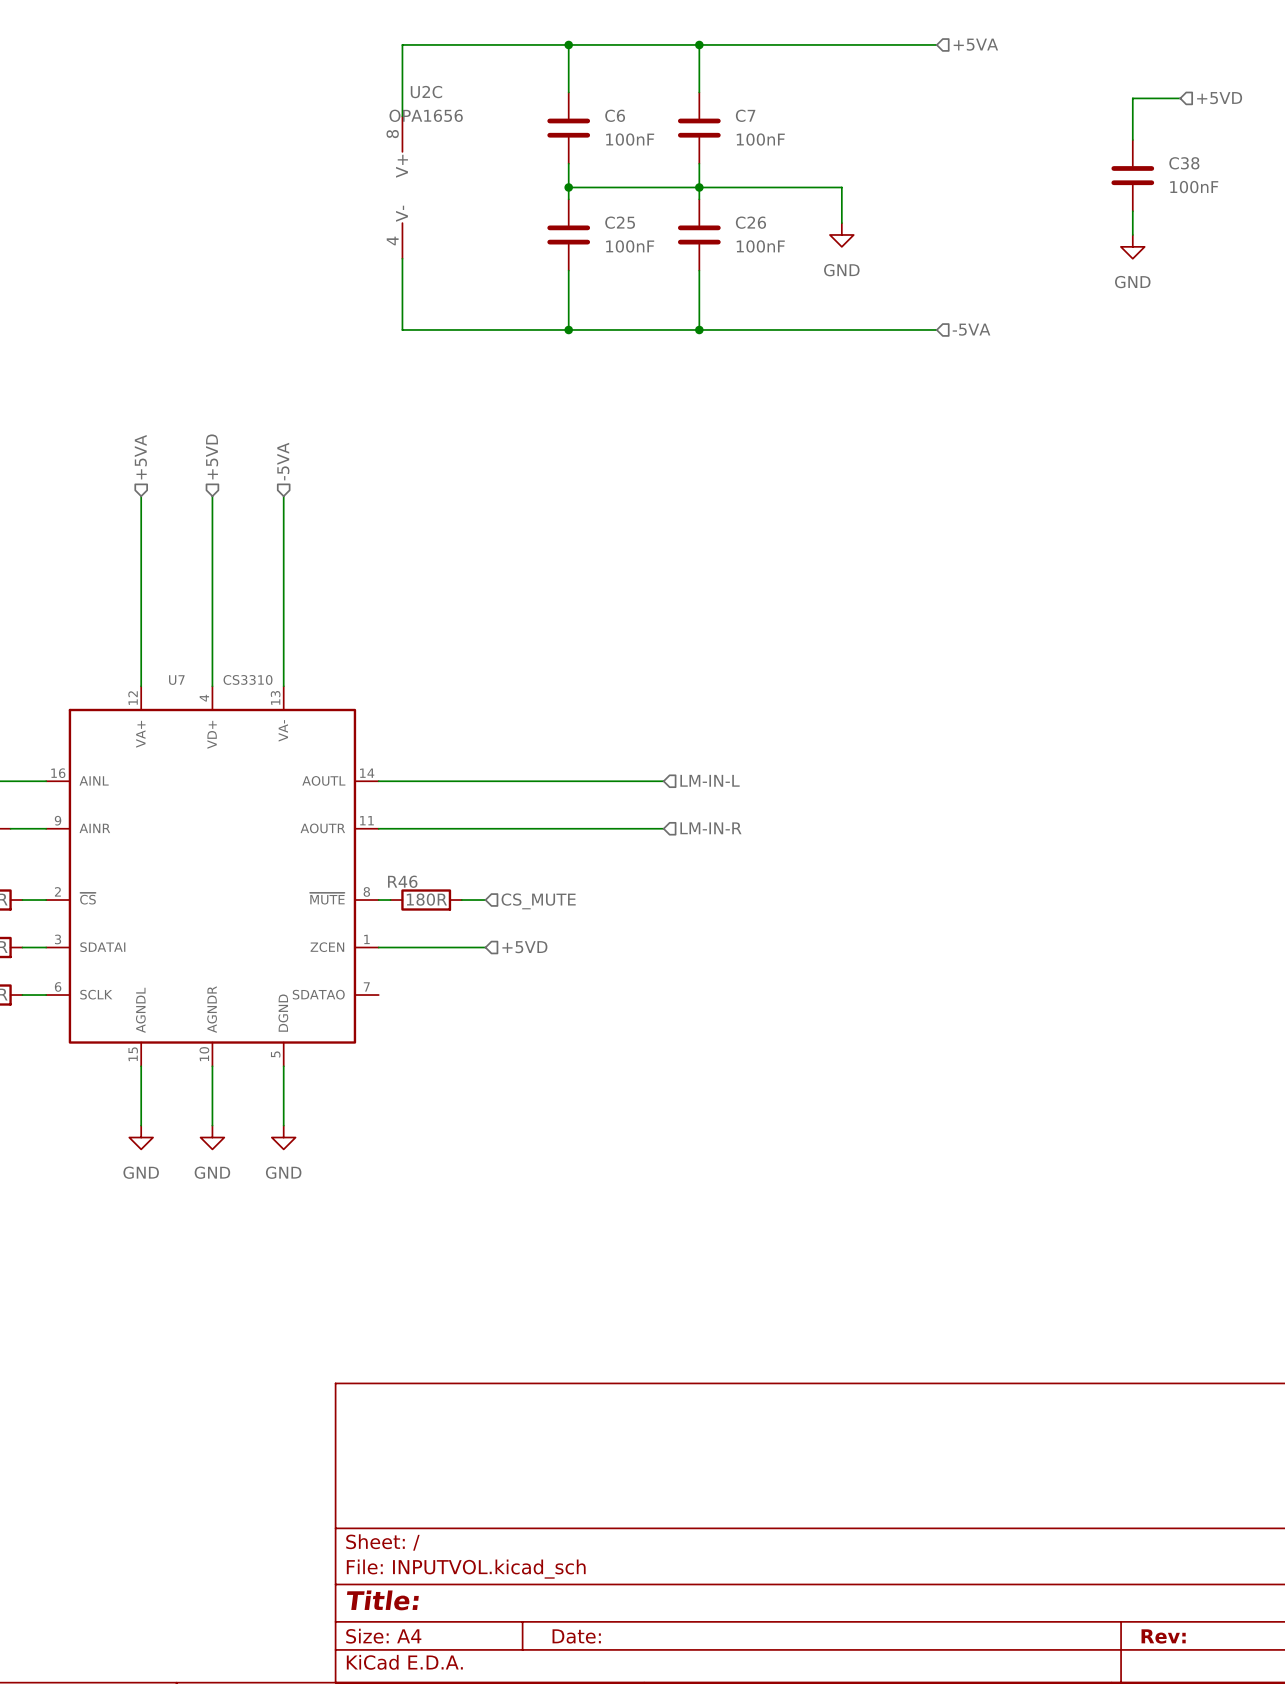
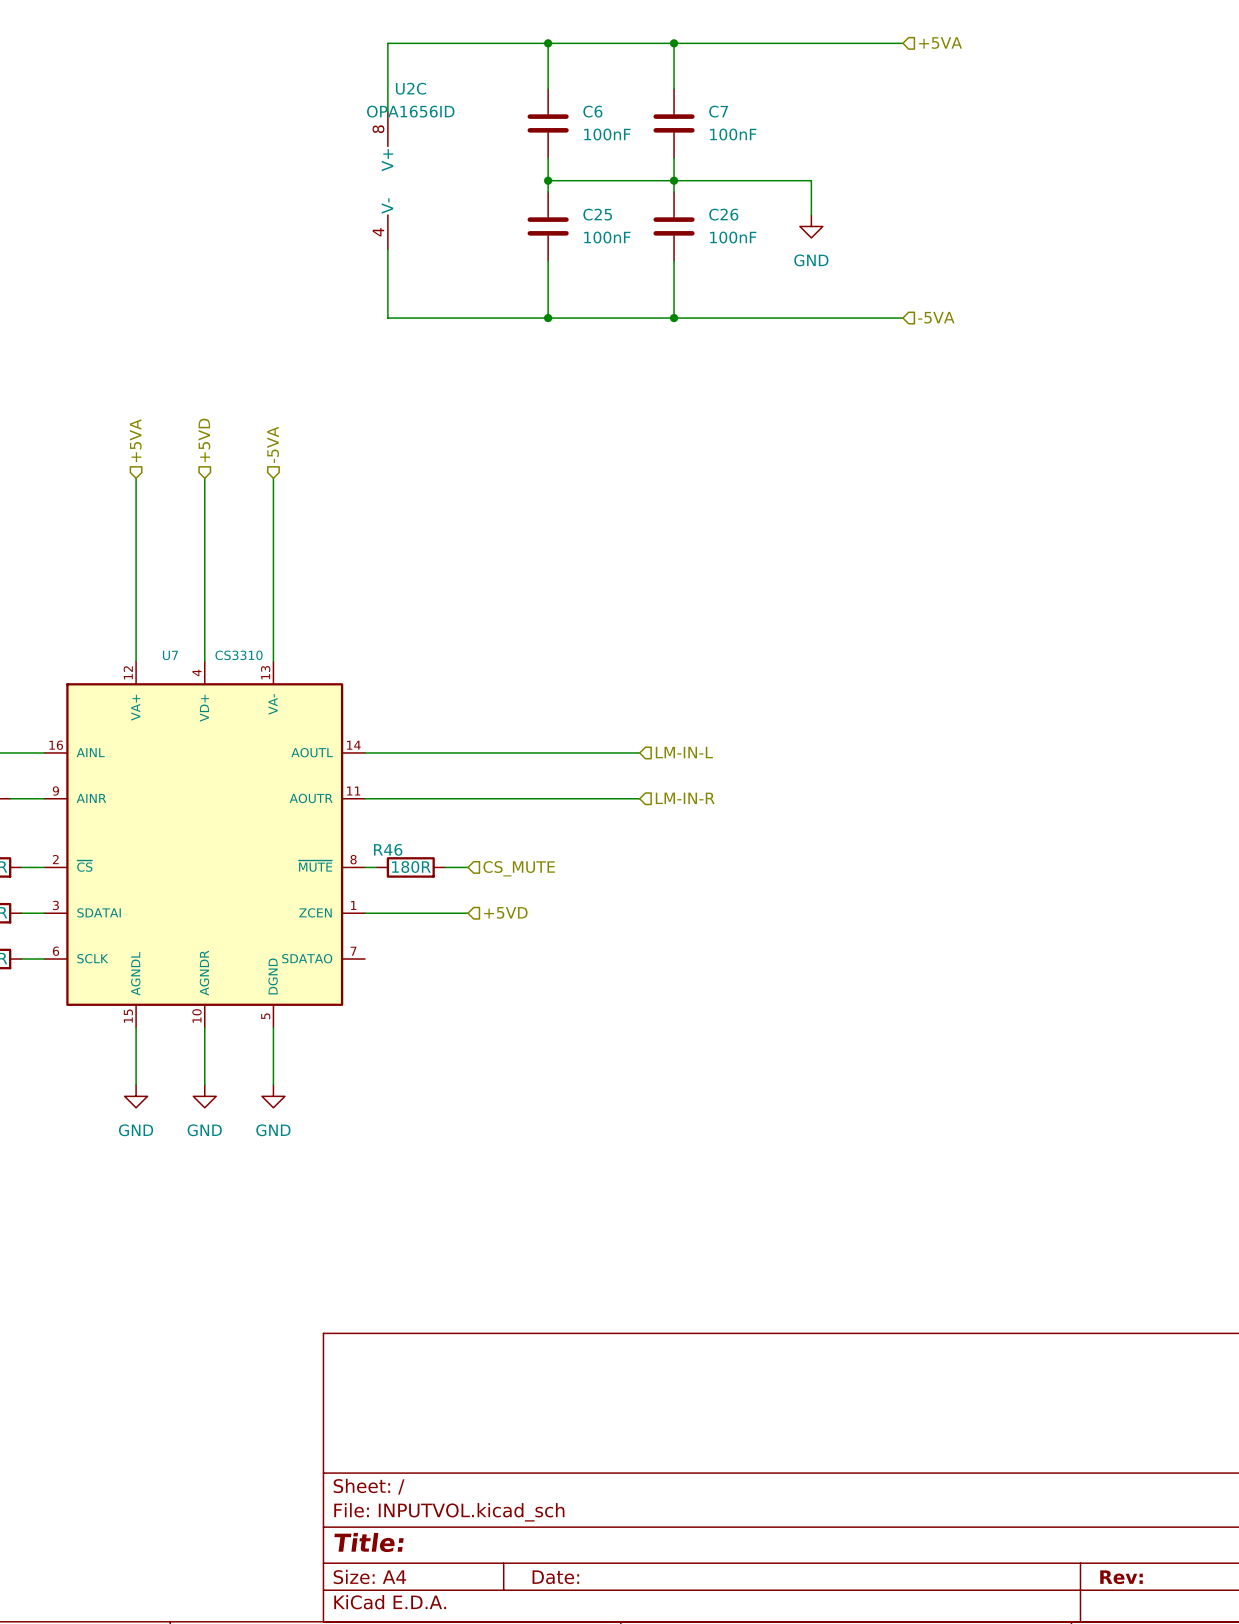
wire: (1180, 98) (1132, 98) (1132, 139) -> none
hierarchical label: +5VD (1219, 98) -> none
U2C value: OPA1656 (426, 115) -> OPA1656ID (410, 111)
C38: 100nF (1132, 175) -> none
wire: (1132, 211) (1132, 234) -> none
power symbol: GND (1132, 246) -> none

